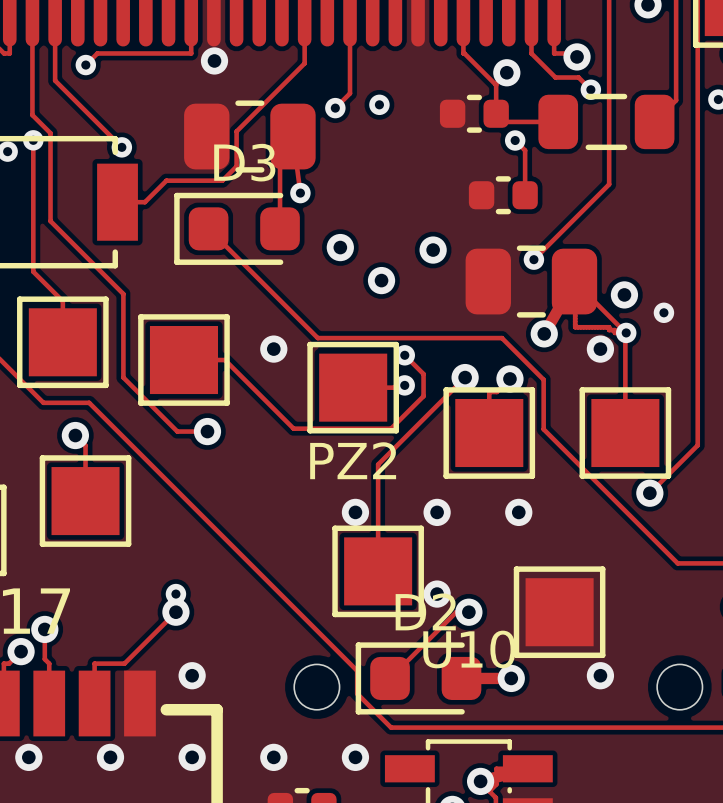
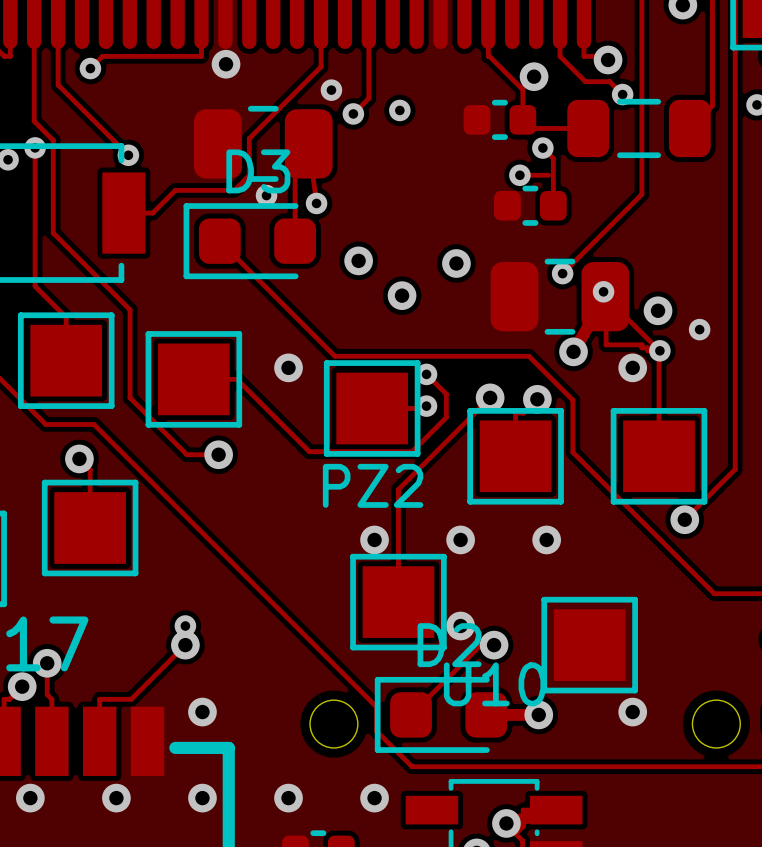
via: none -> (331, 90)
track: none -> (519, 175) (548, 175)
via: none -> (519, 175)
via: none -> (266, 195)
via: none -> (603, 291)

